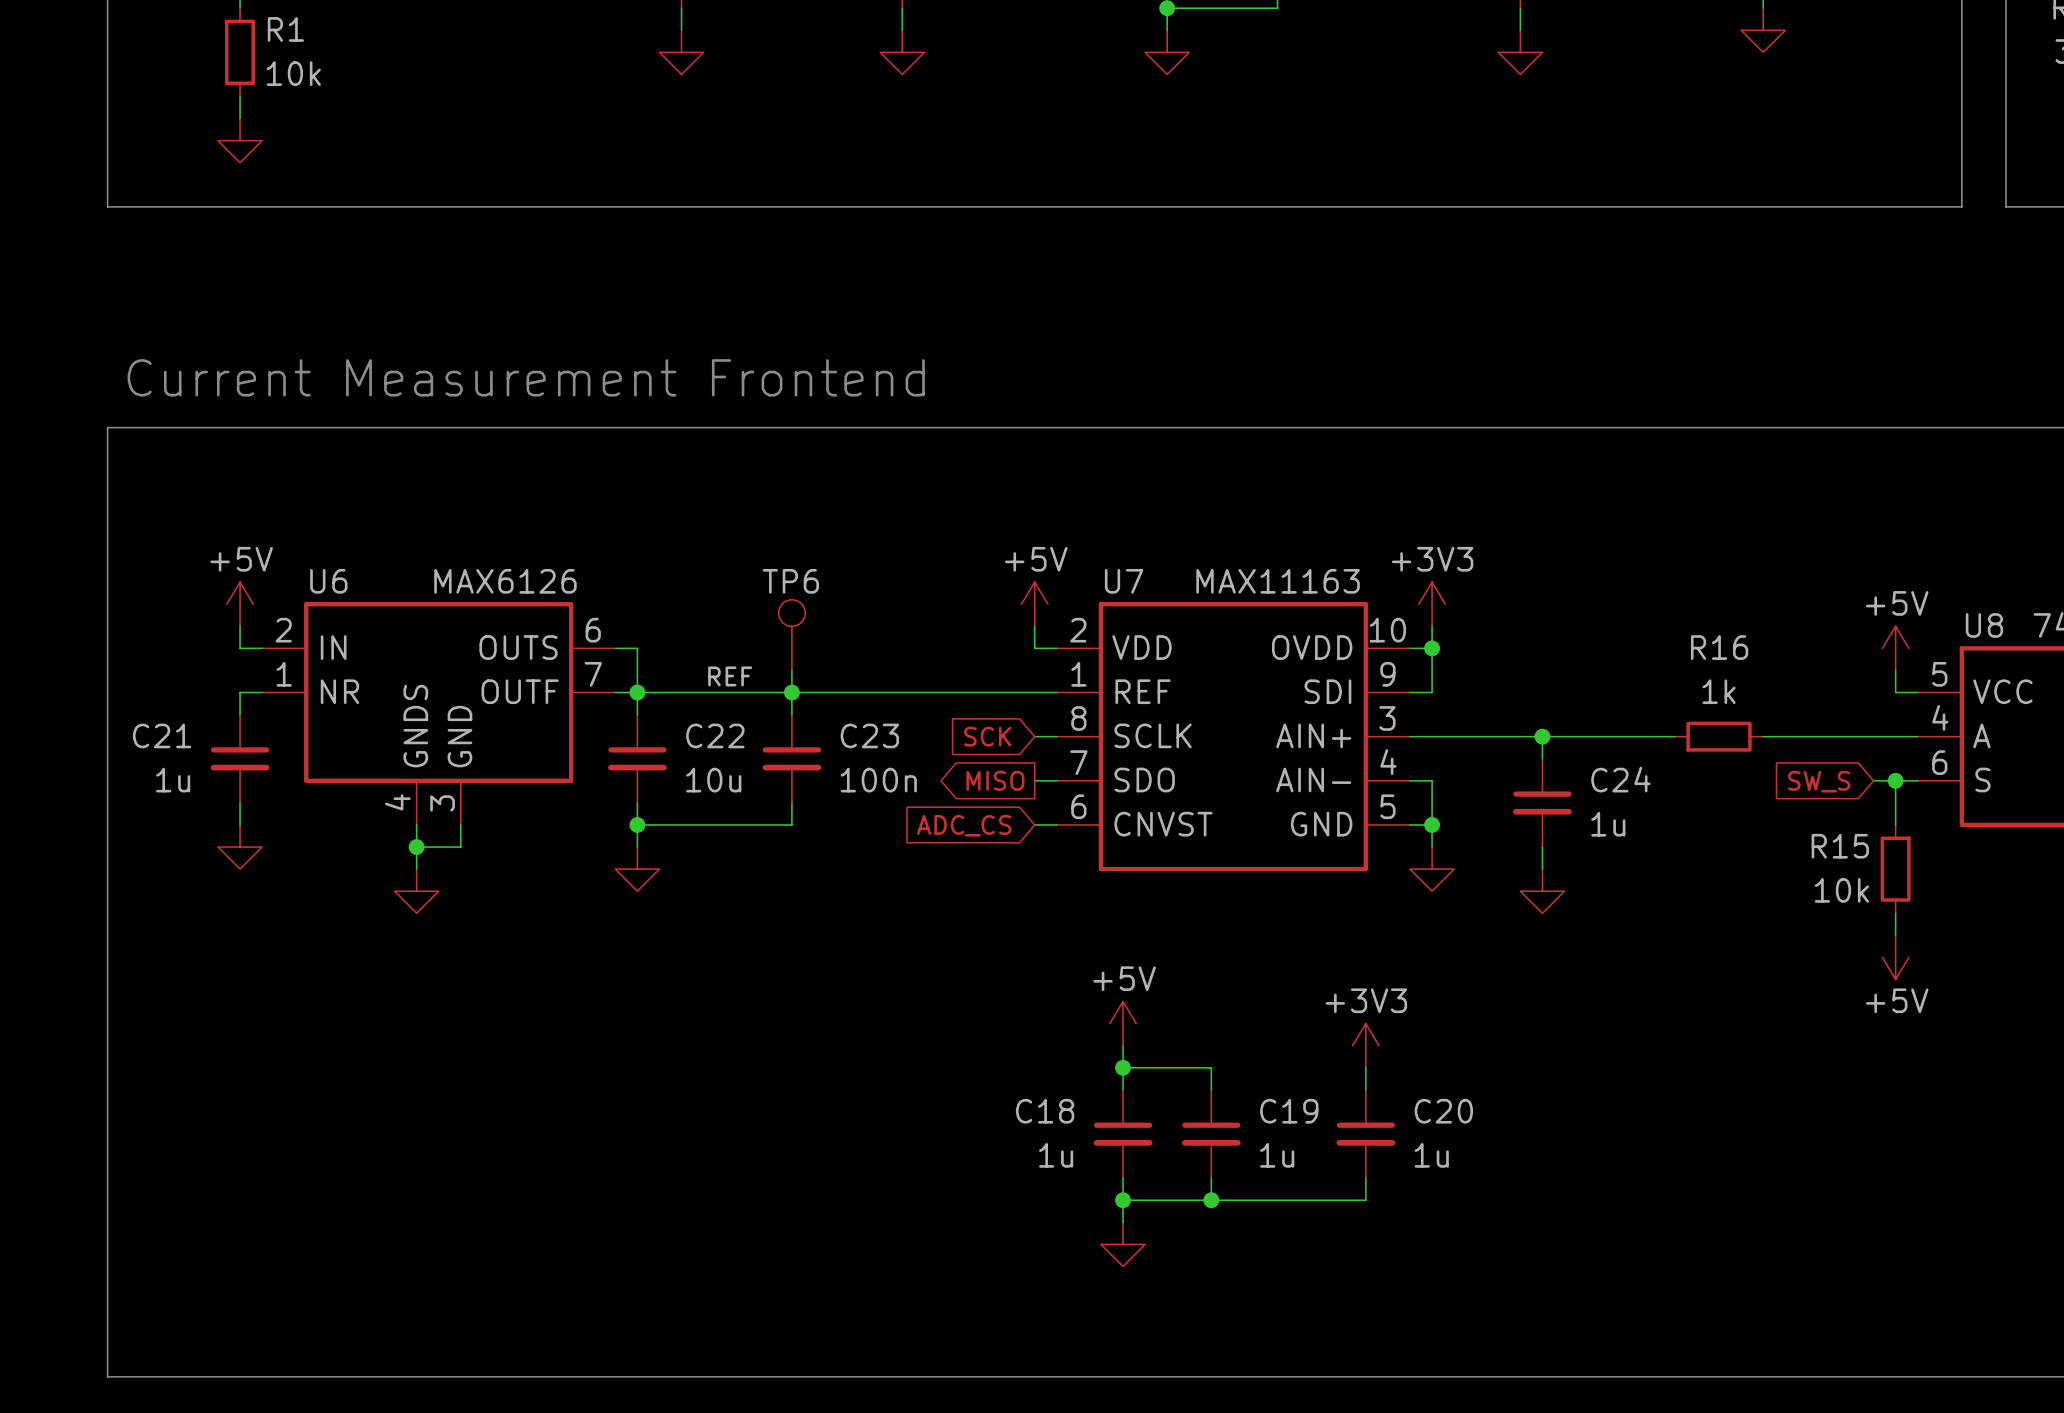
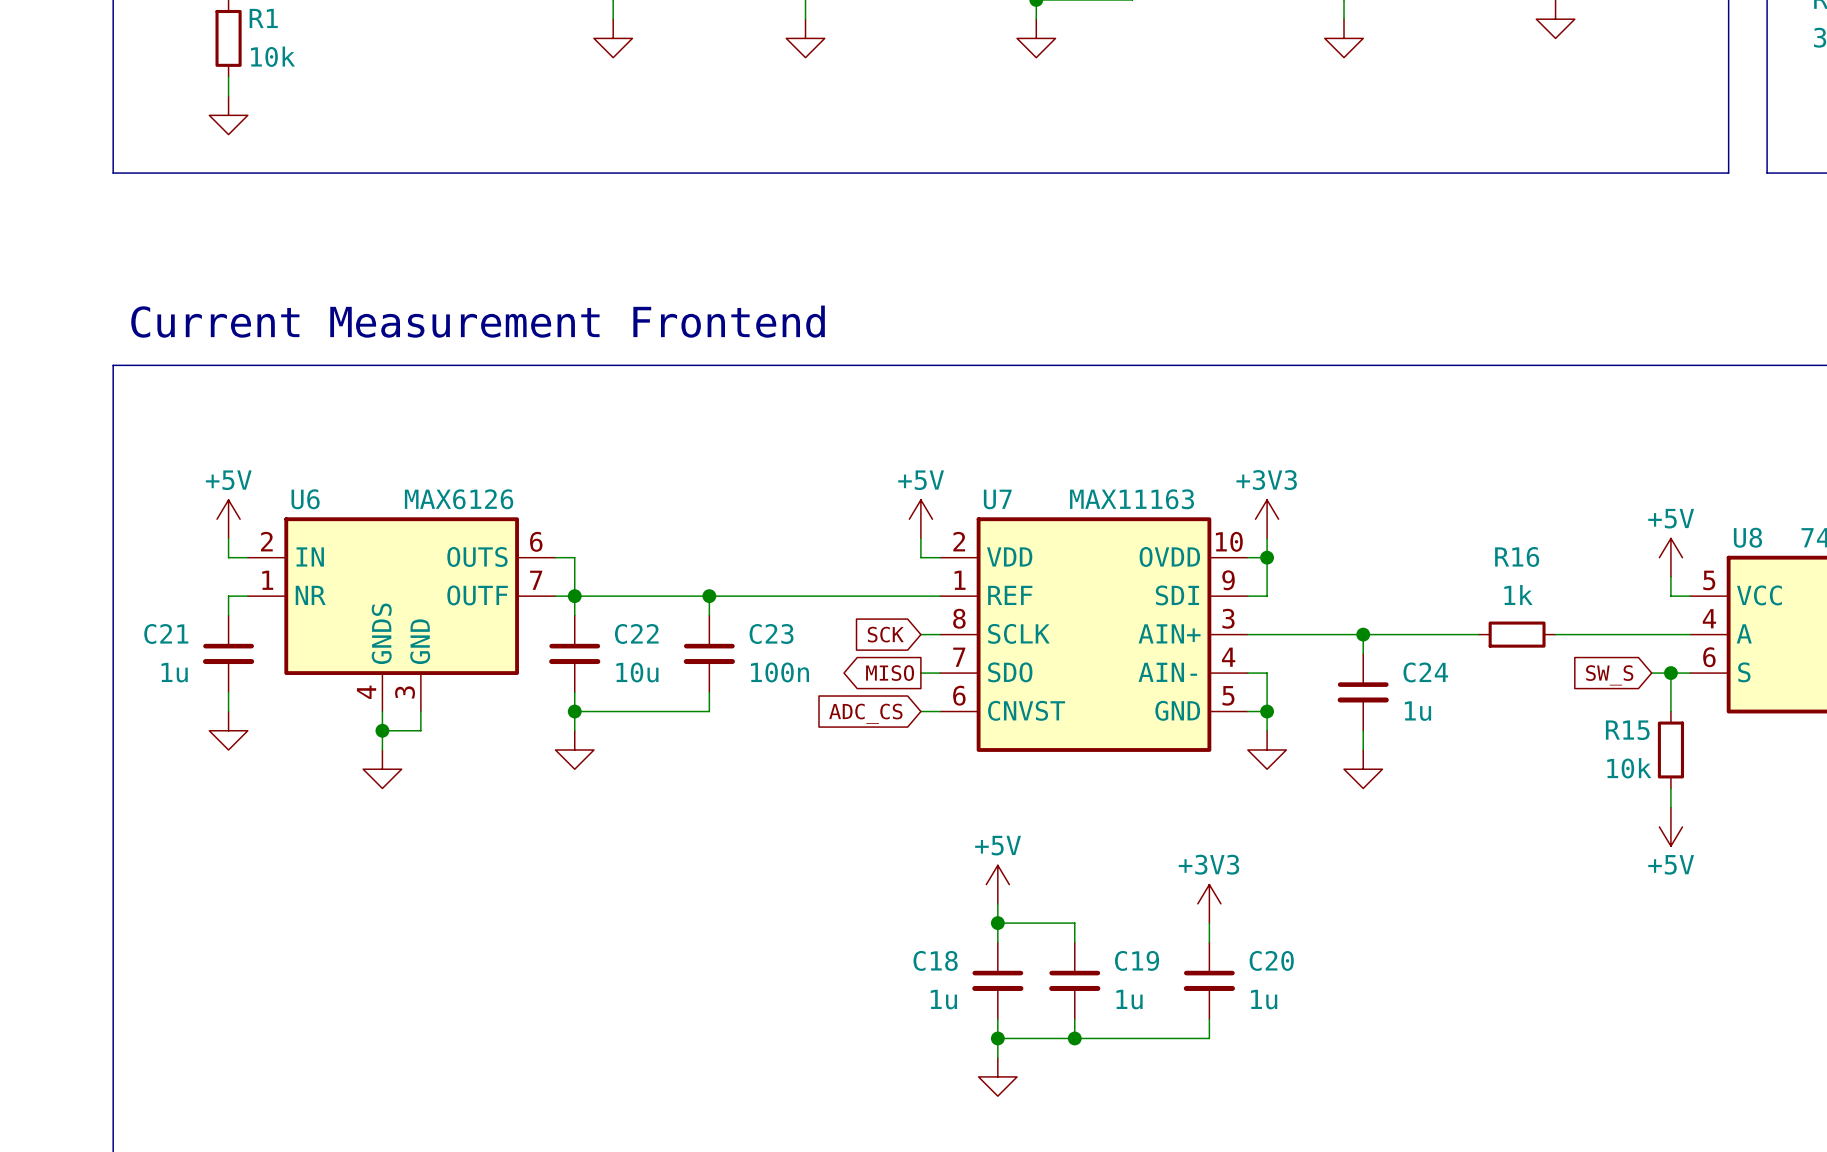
TP6: (791, 635) -> none
wire: (791, 670) (791, 692) -> none
label: REF (730, 676) -> none

